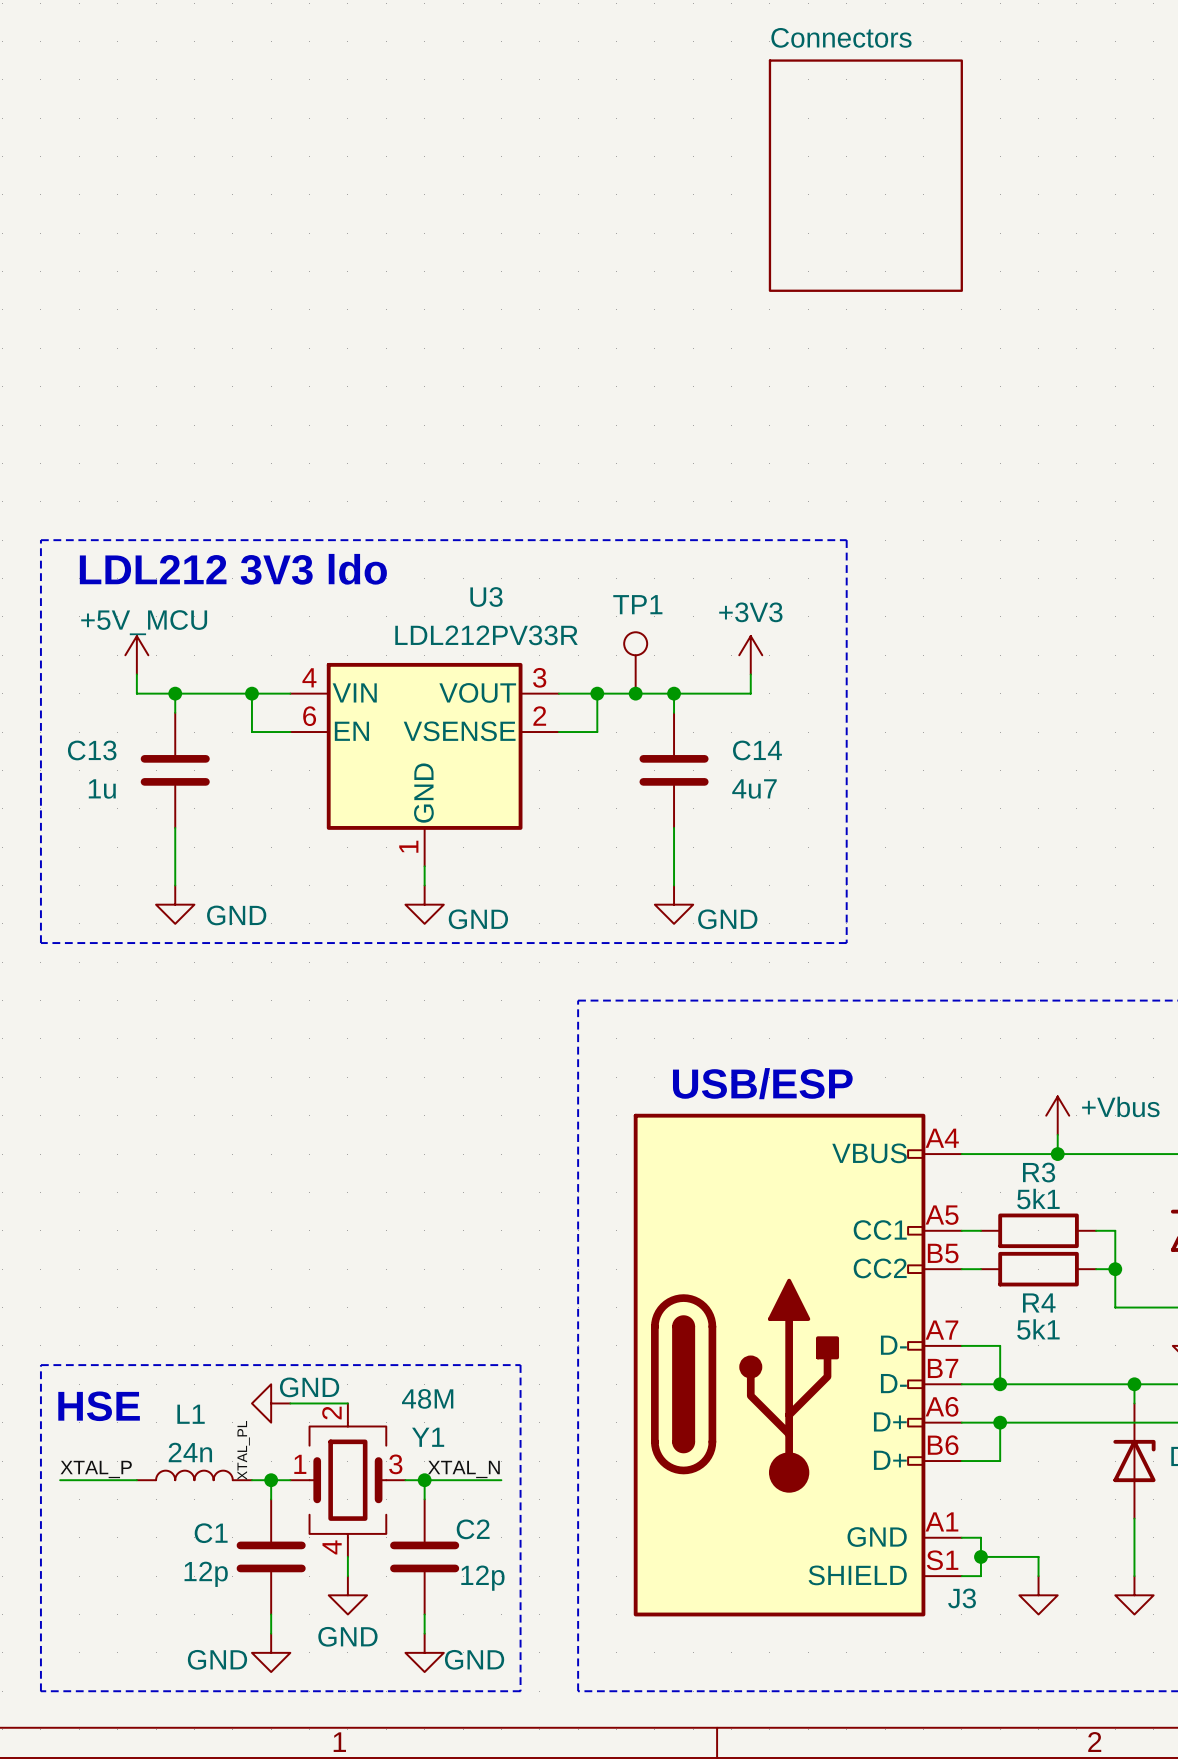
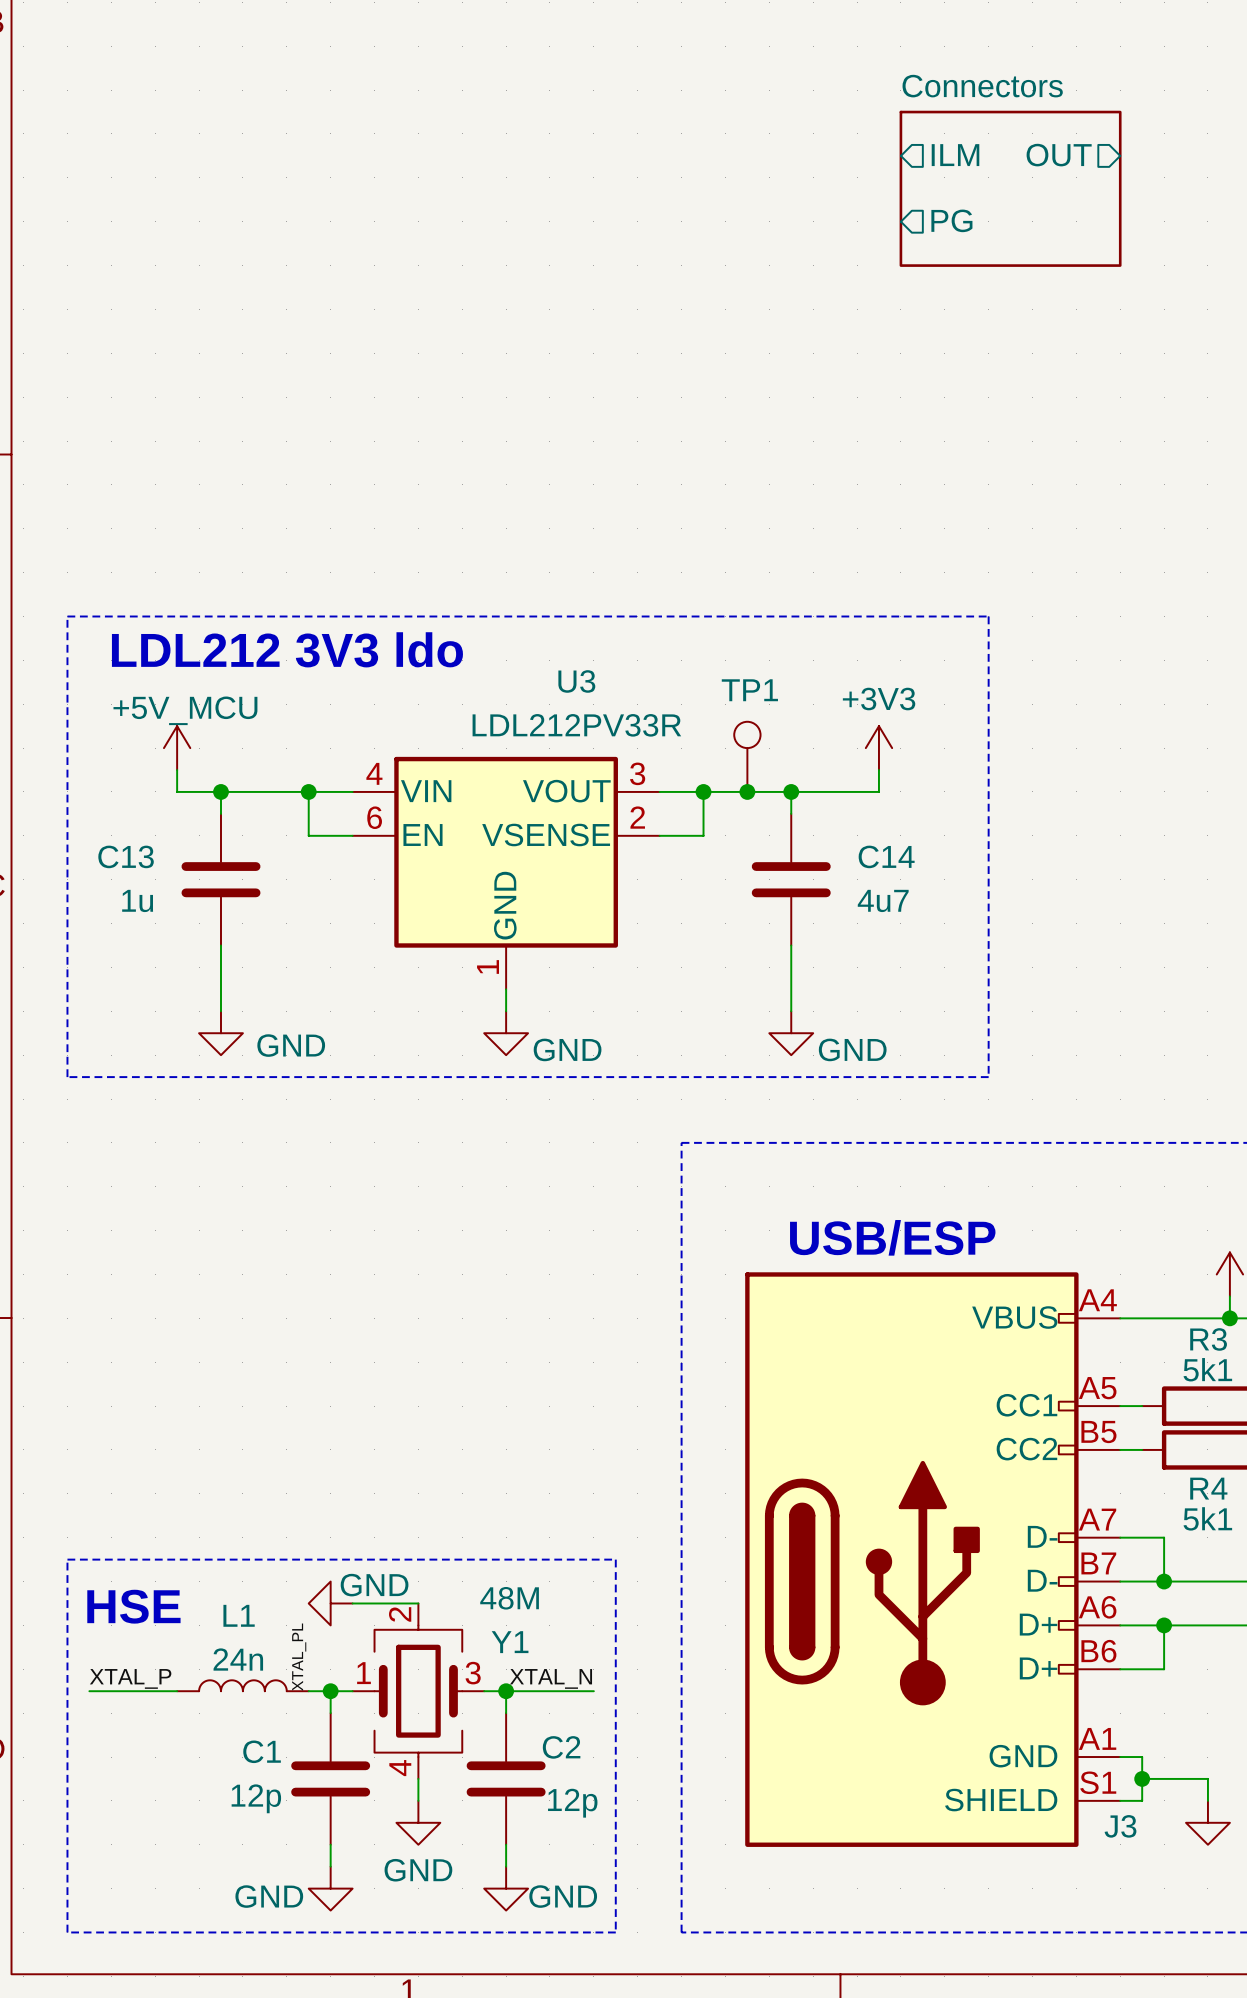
sheet Connectors name position: Connectors (841, 37) -> Connectors (982, 86)
sheet Connectors shape: [768, 59, 963, 292] -> [899, 110, 1122, 267]
sheet pin: none -> ILM (955, 155)
sheet pin: none -> OUT (1059, 155)
sheet pin: none -> PG (951, 220)

